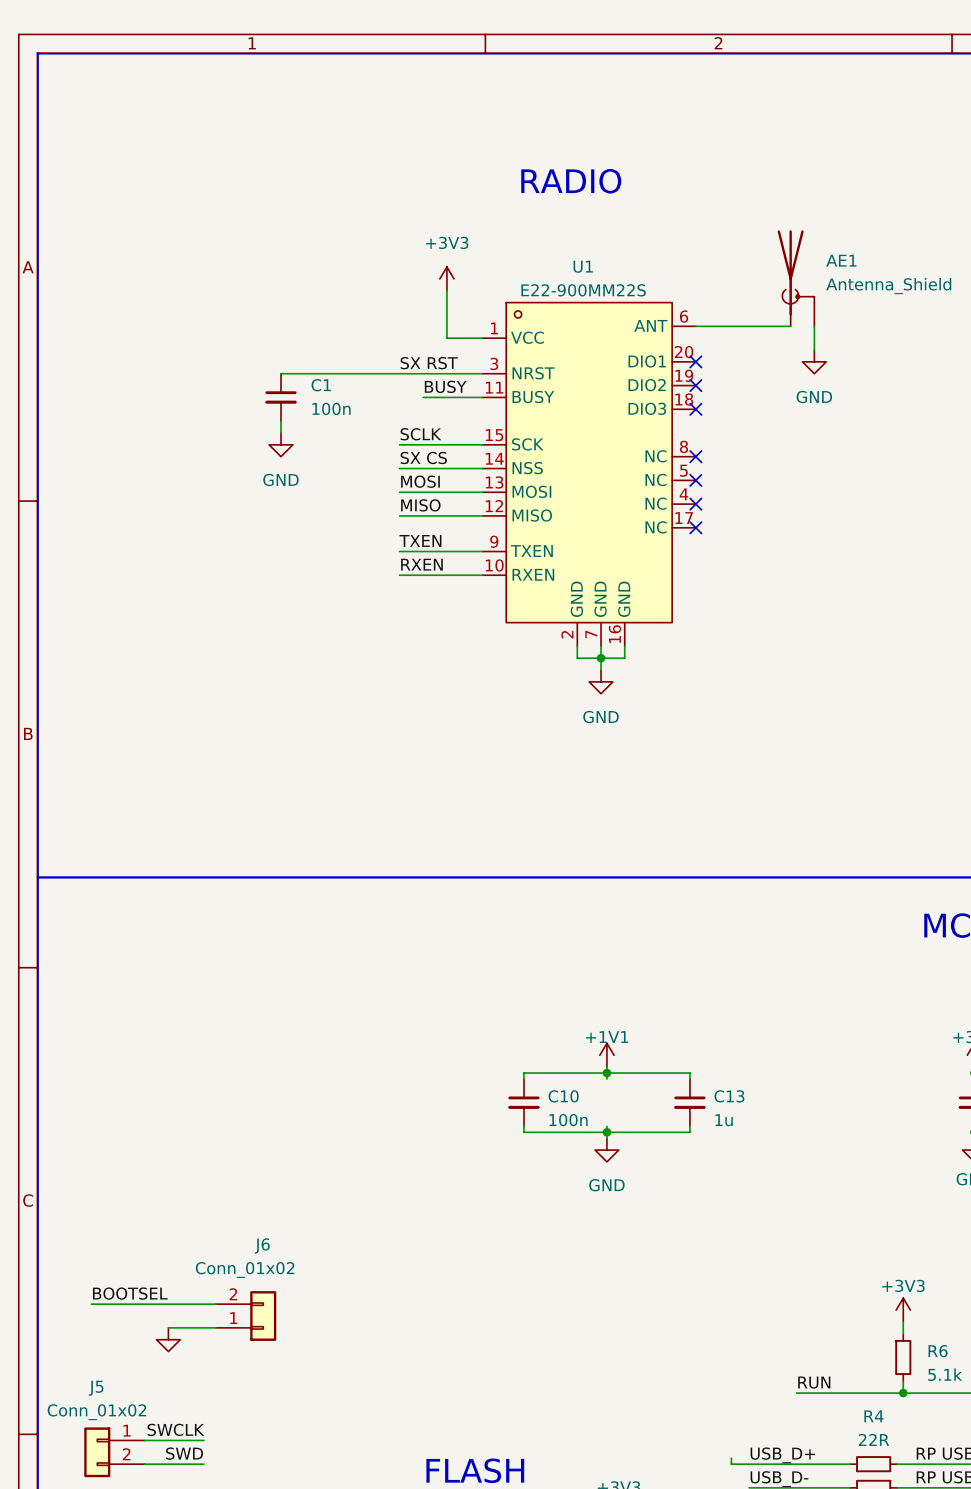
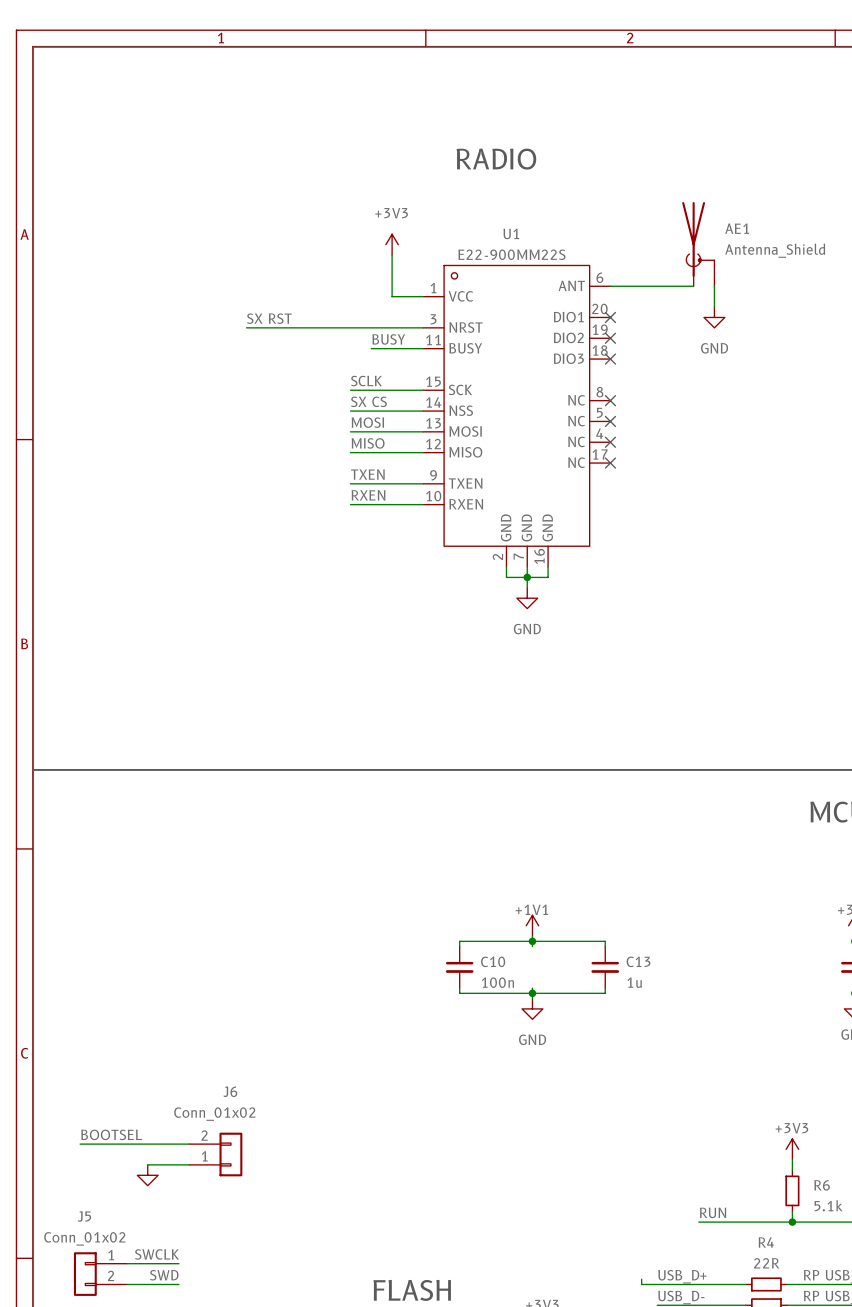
label position: SX RST (429, 363) -> SX RST (269, 318)
C1: 100n (281, 397) -> none
wire: (281, 421) (281, 432) -> none
power symbol: GND (281, 444) -> none

